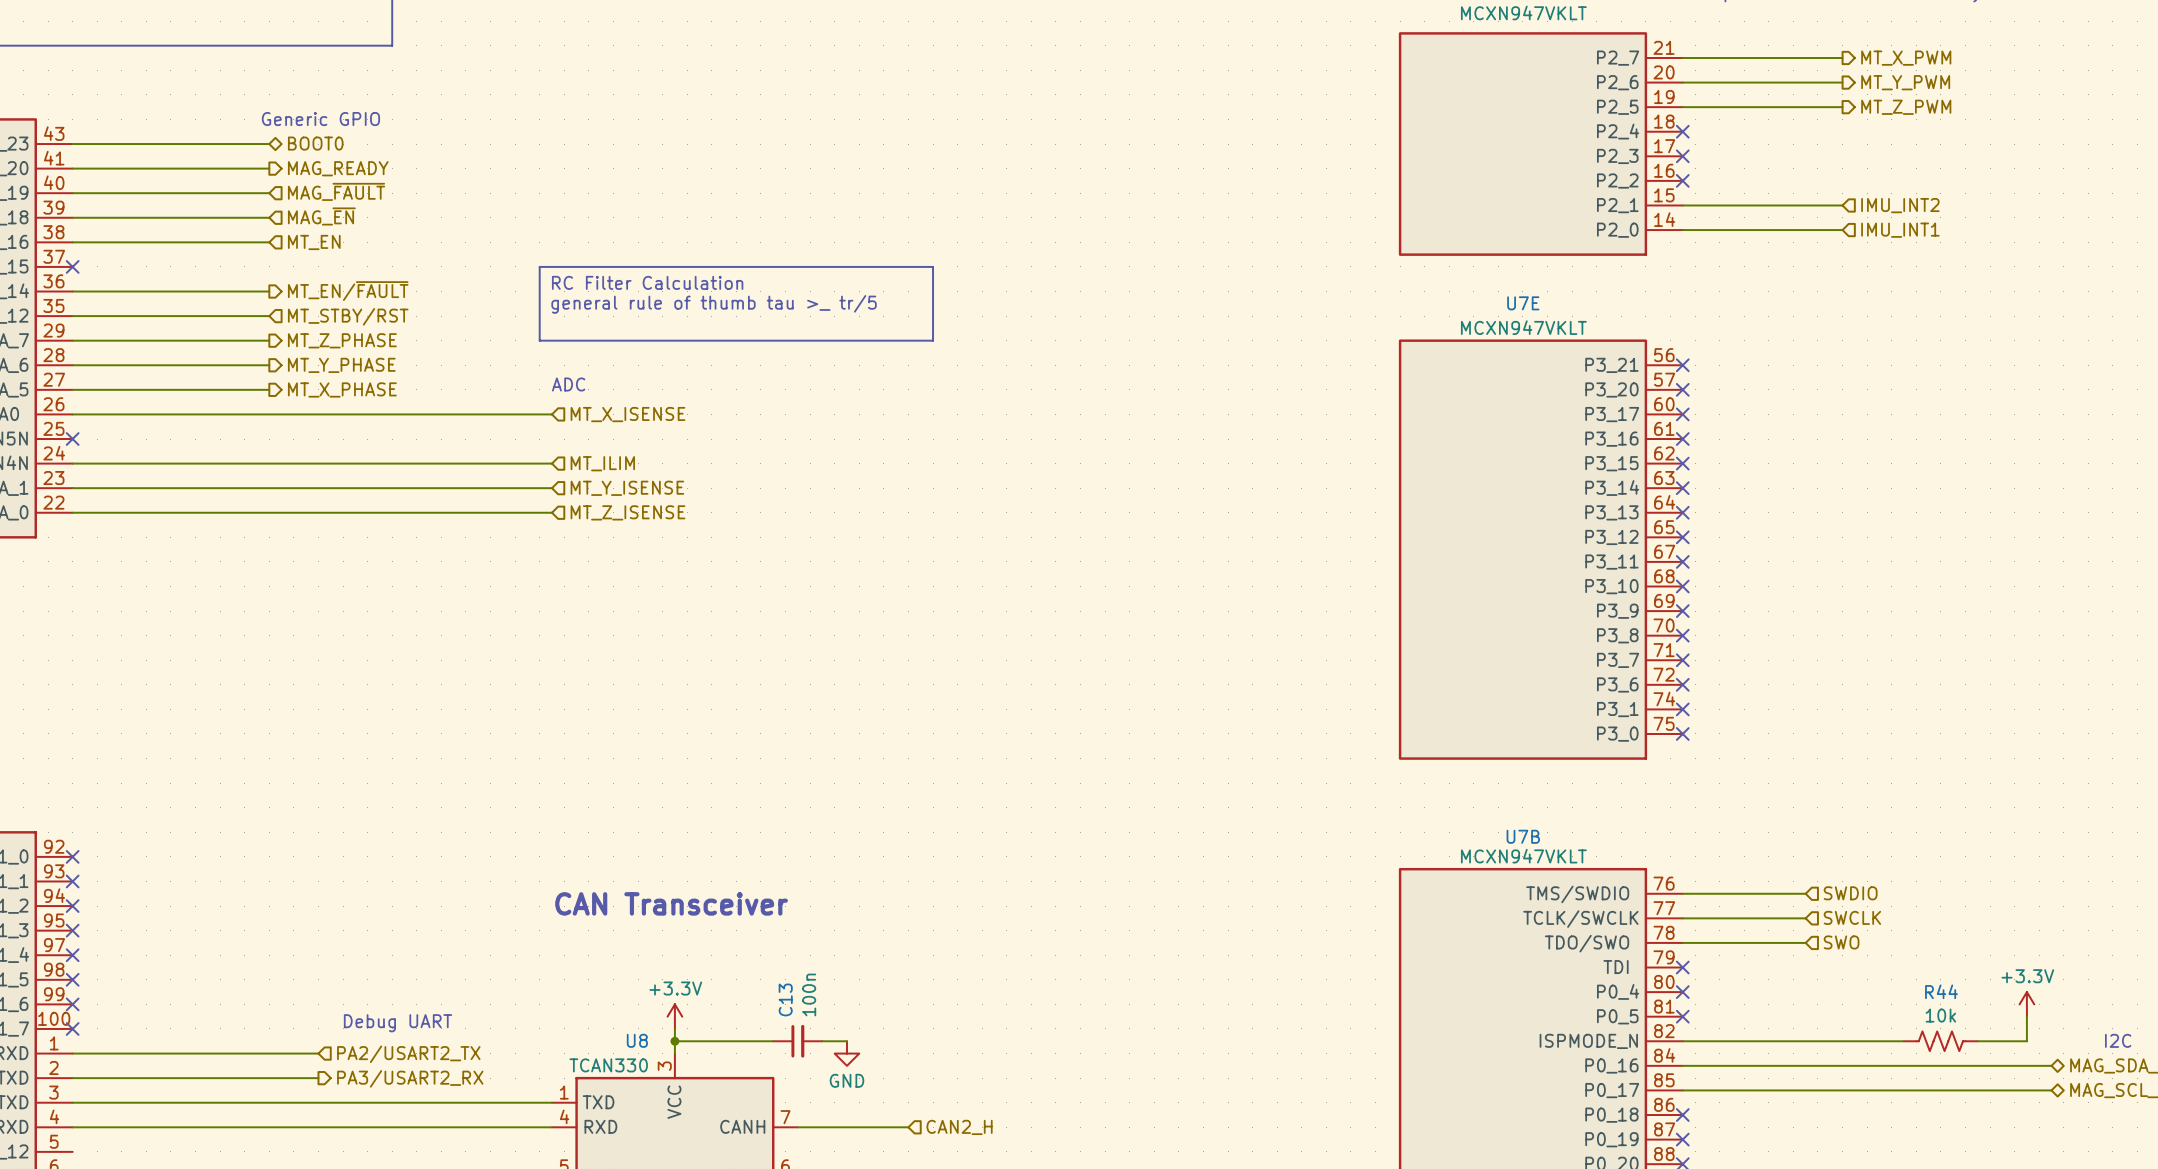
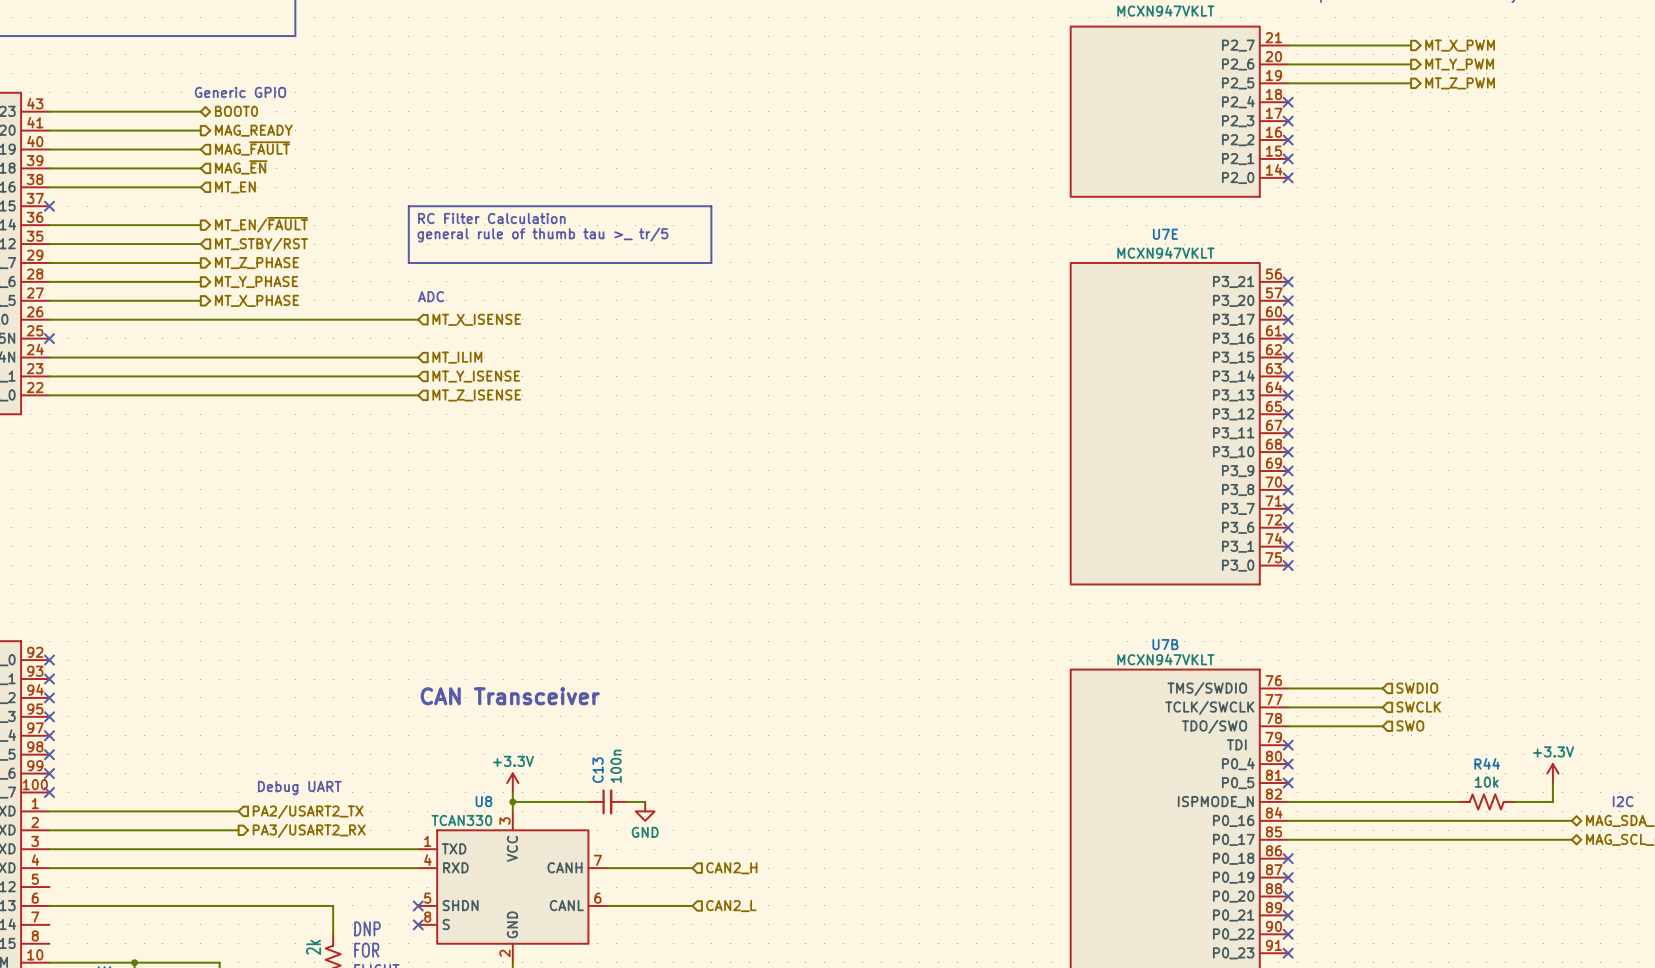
wire: (1682, 205) (1842, 205) -> none
no-connect mark: none -> (1288, 158)
hierarchical label: IMU_INT2 (1900, 205) -> none
wire: (1682, 230) (1842, 230) -> none
no-connect mark: none -> (1288, 177)
hierarchical label: IMU_INT1 (1900, 230) -> none

